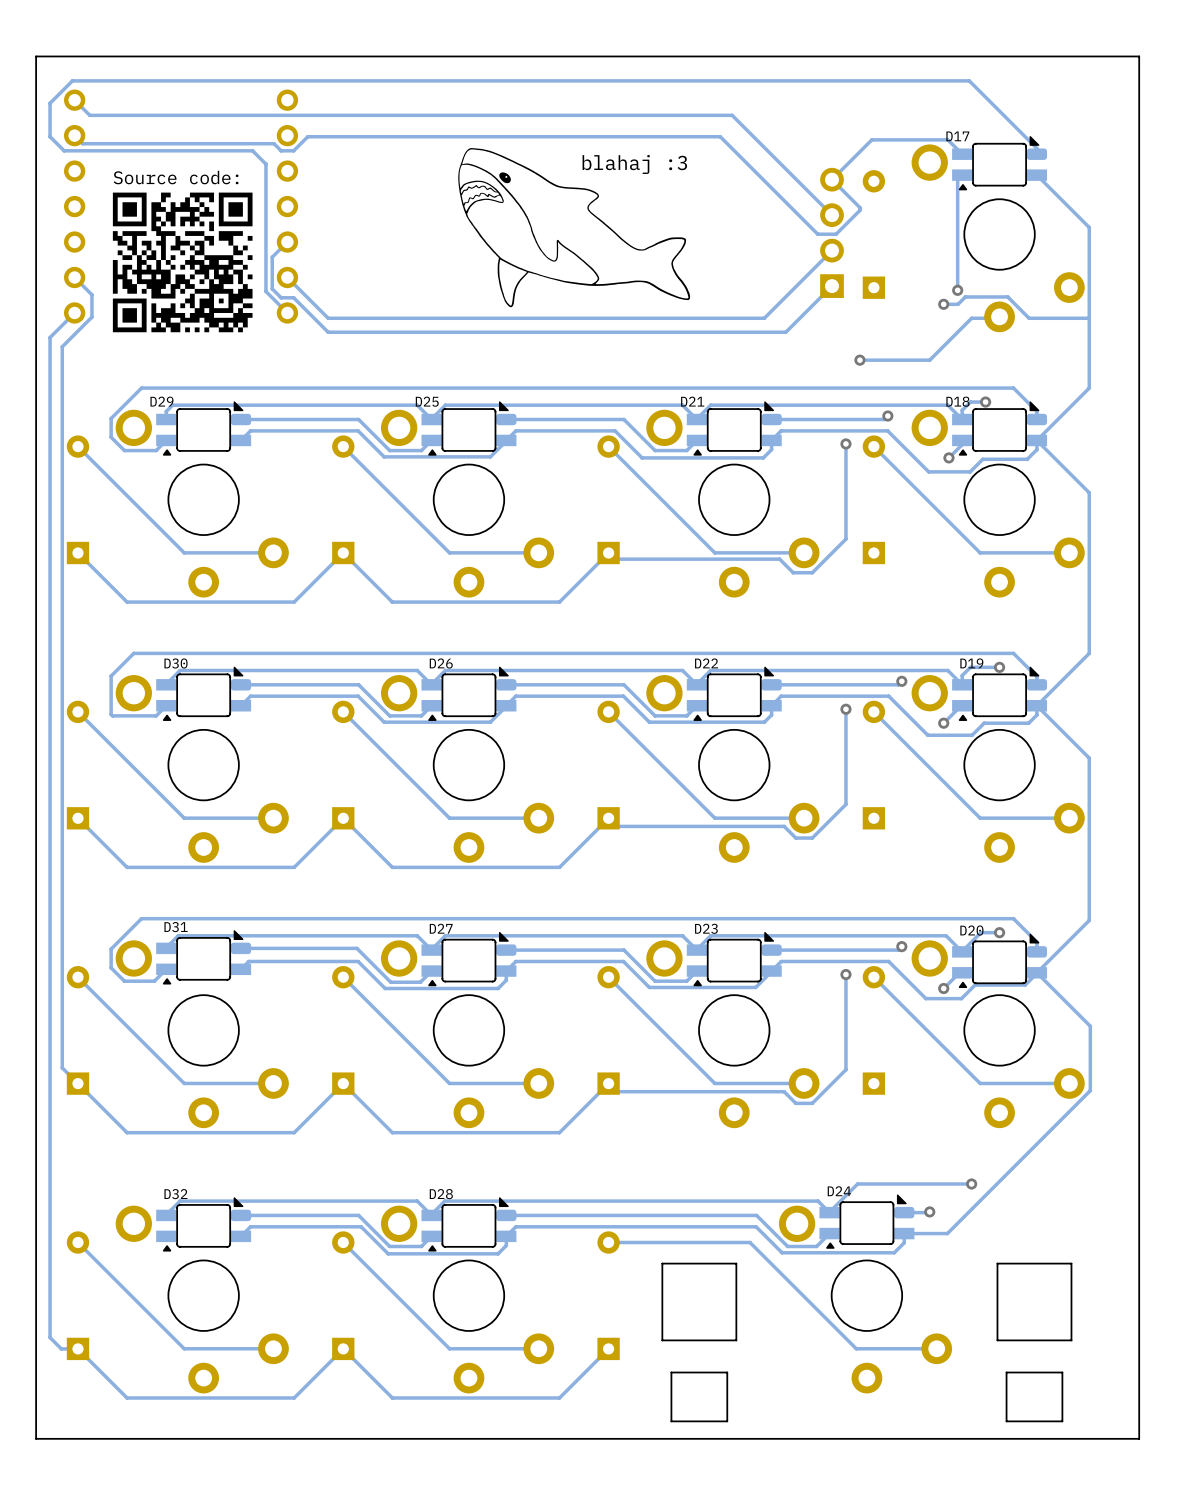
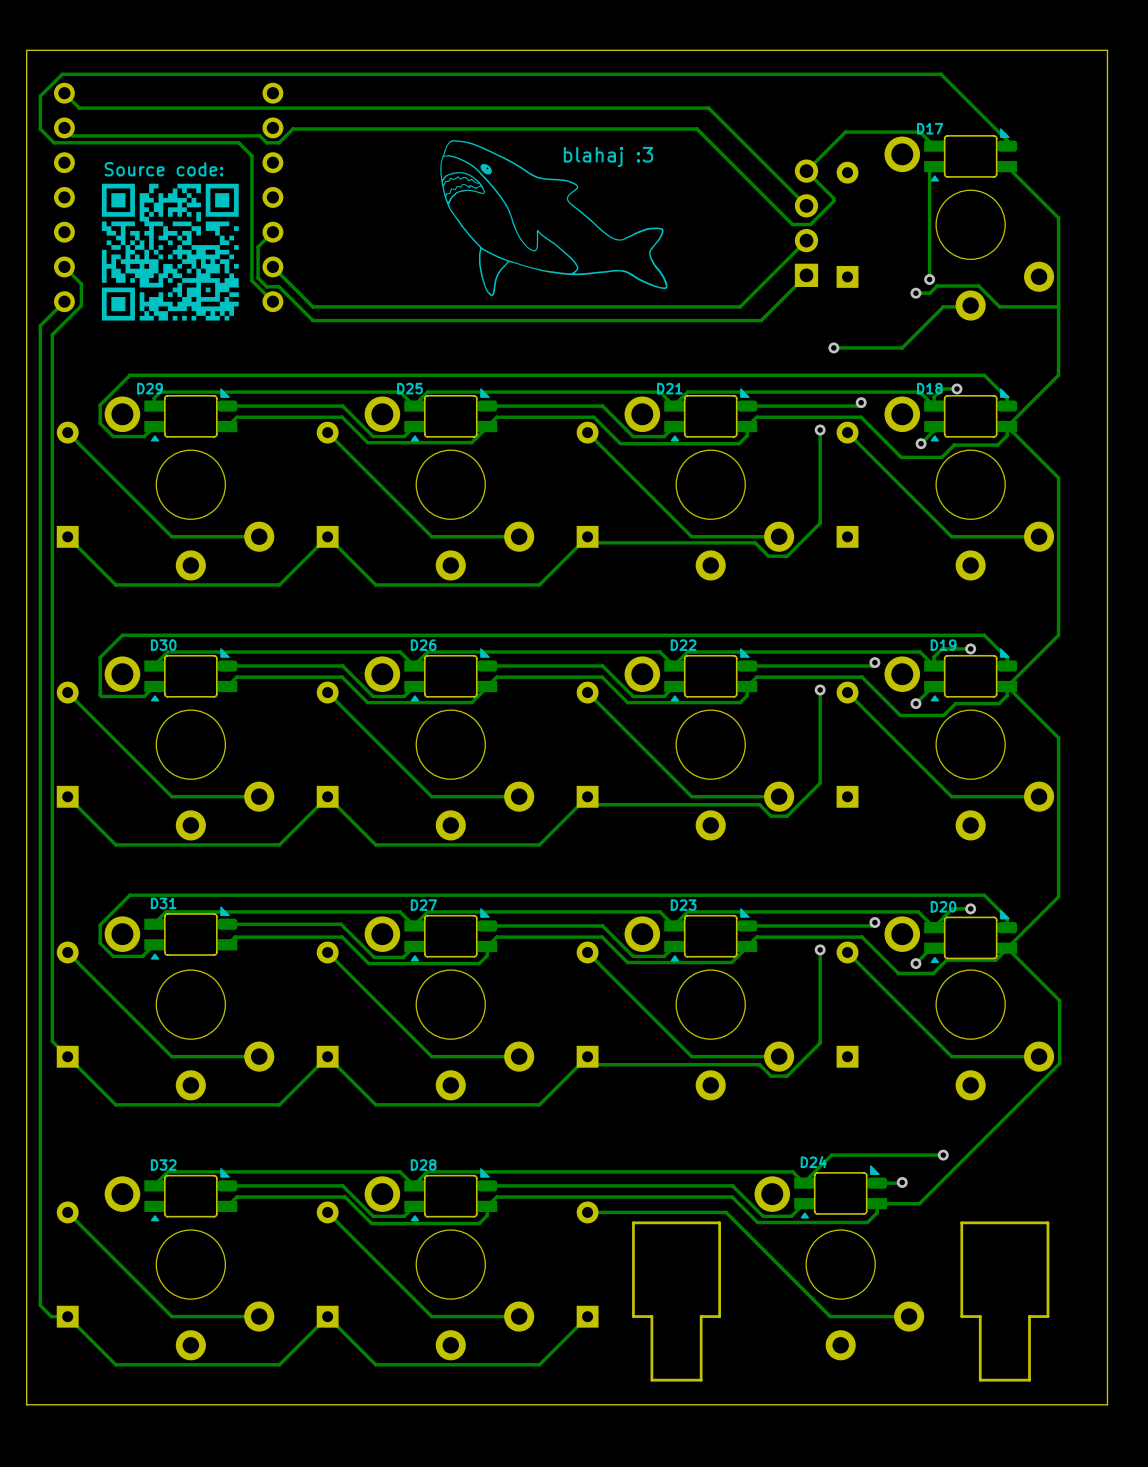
drawing shape: [661, 1262, 1073, 1423] -> [632, 1221, 1050, 1382]

